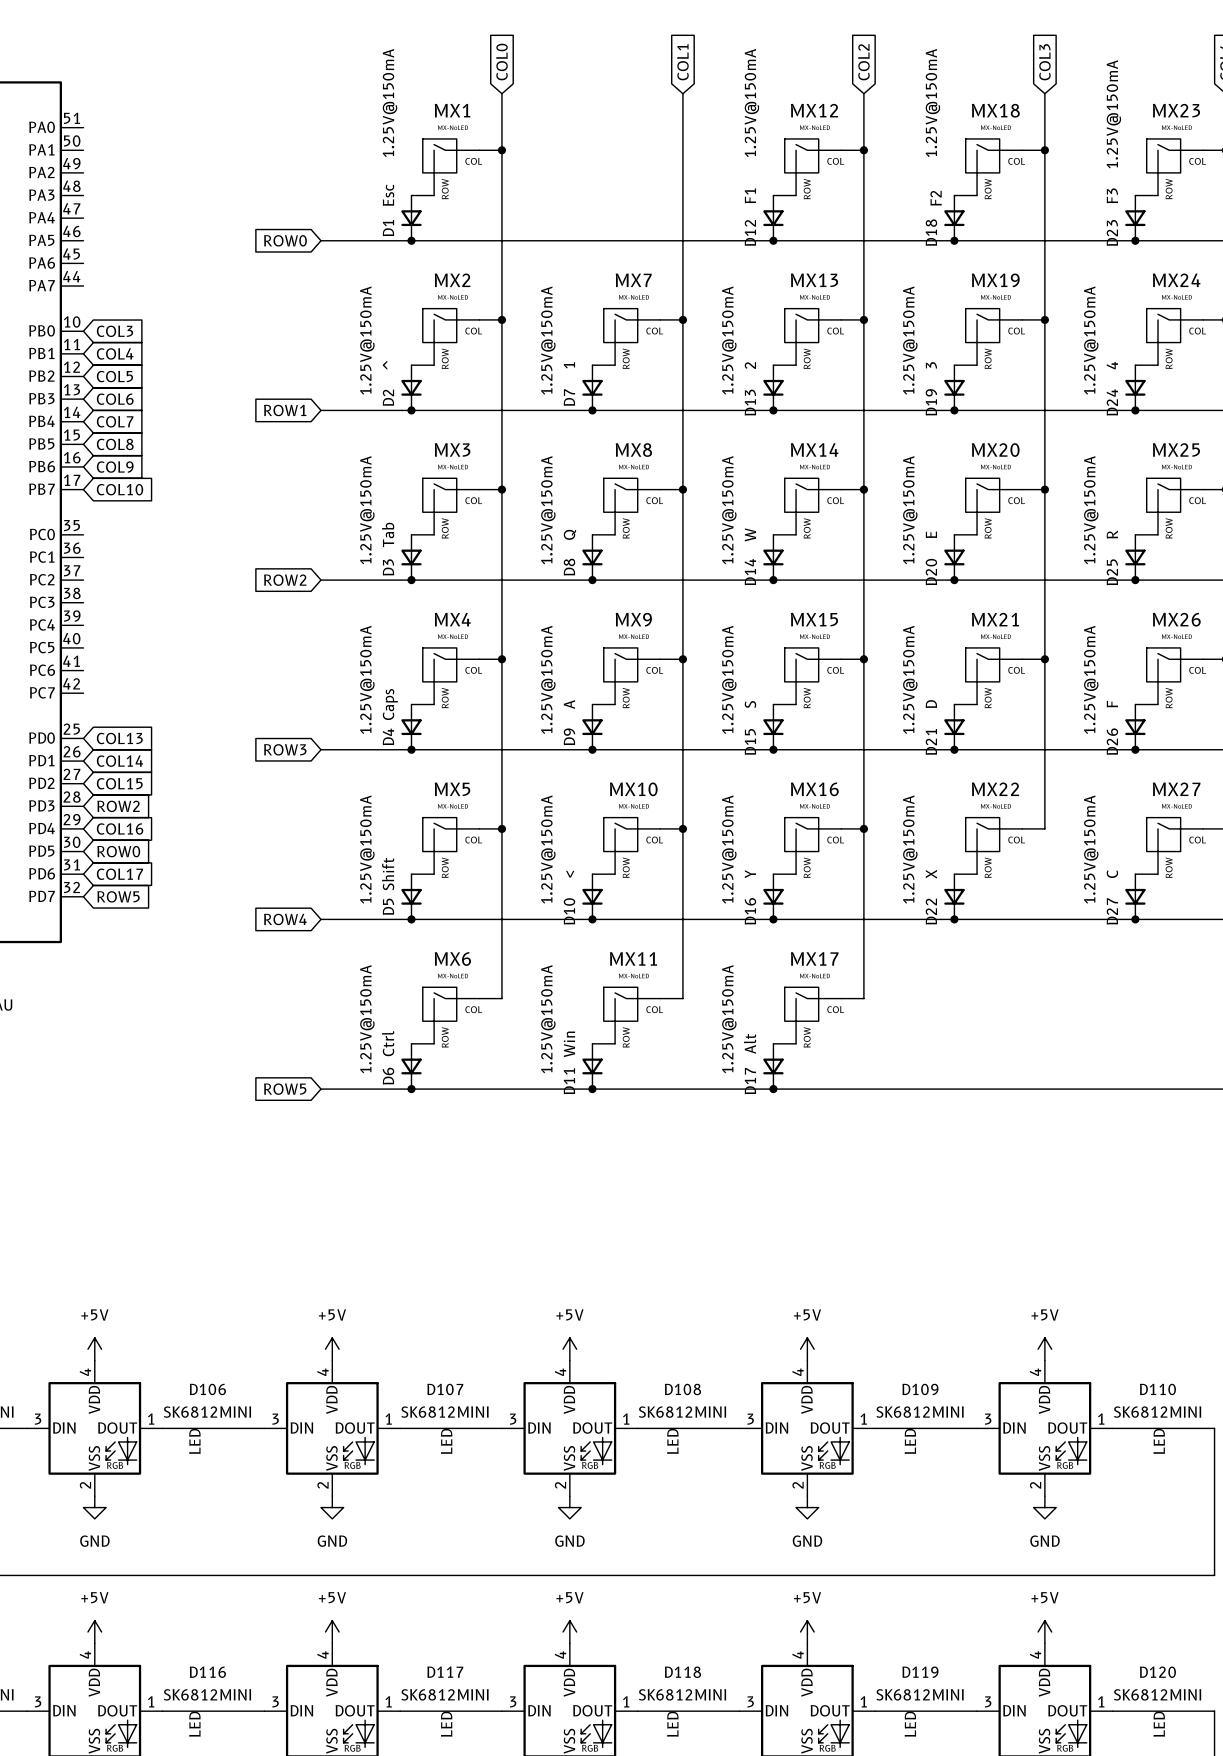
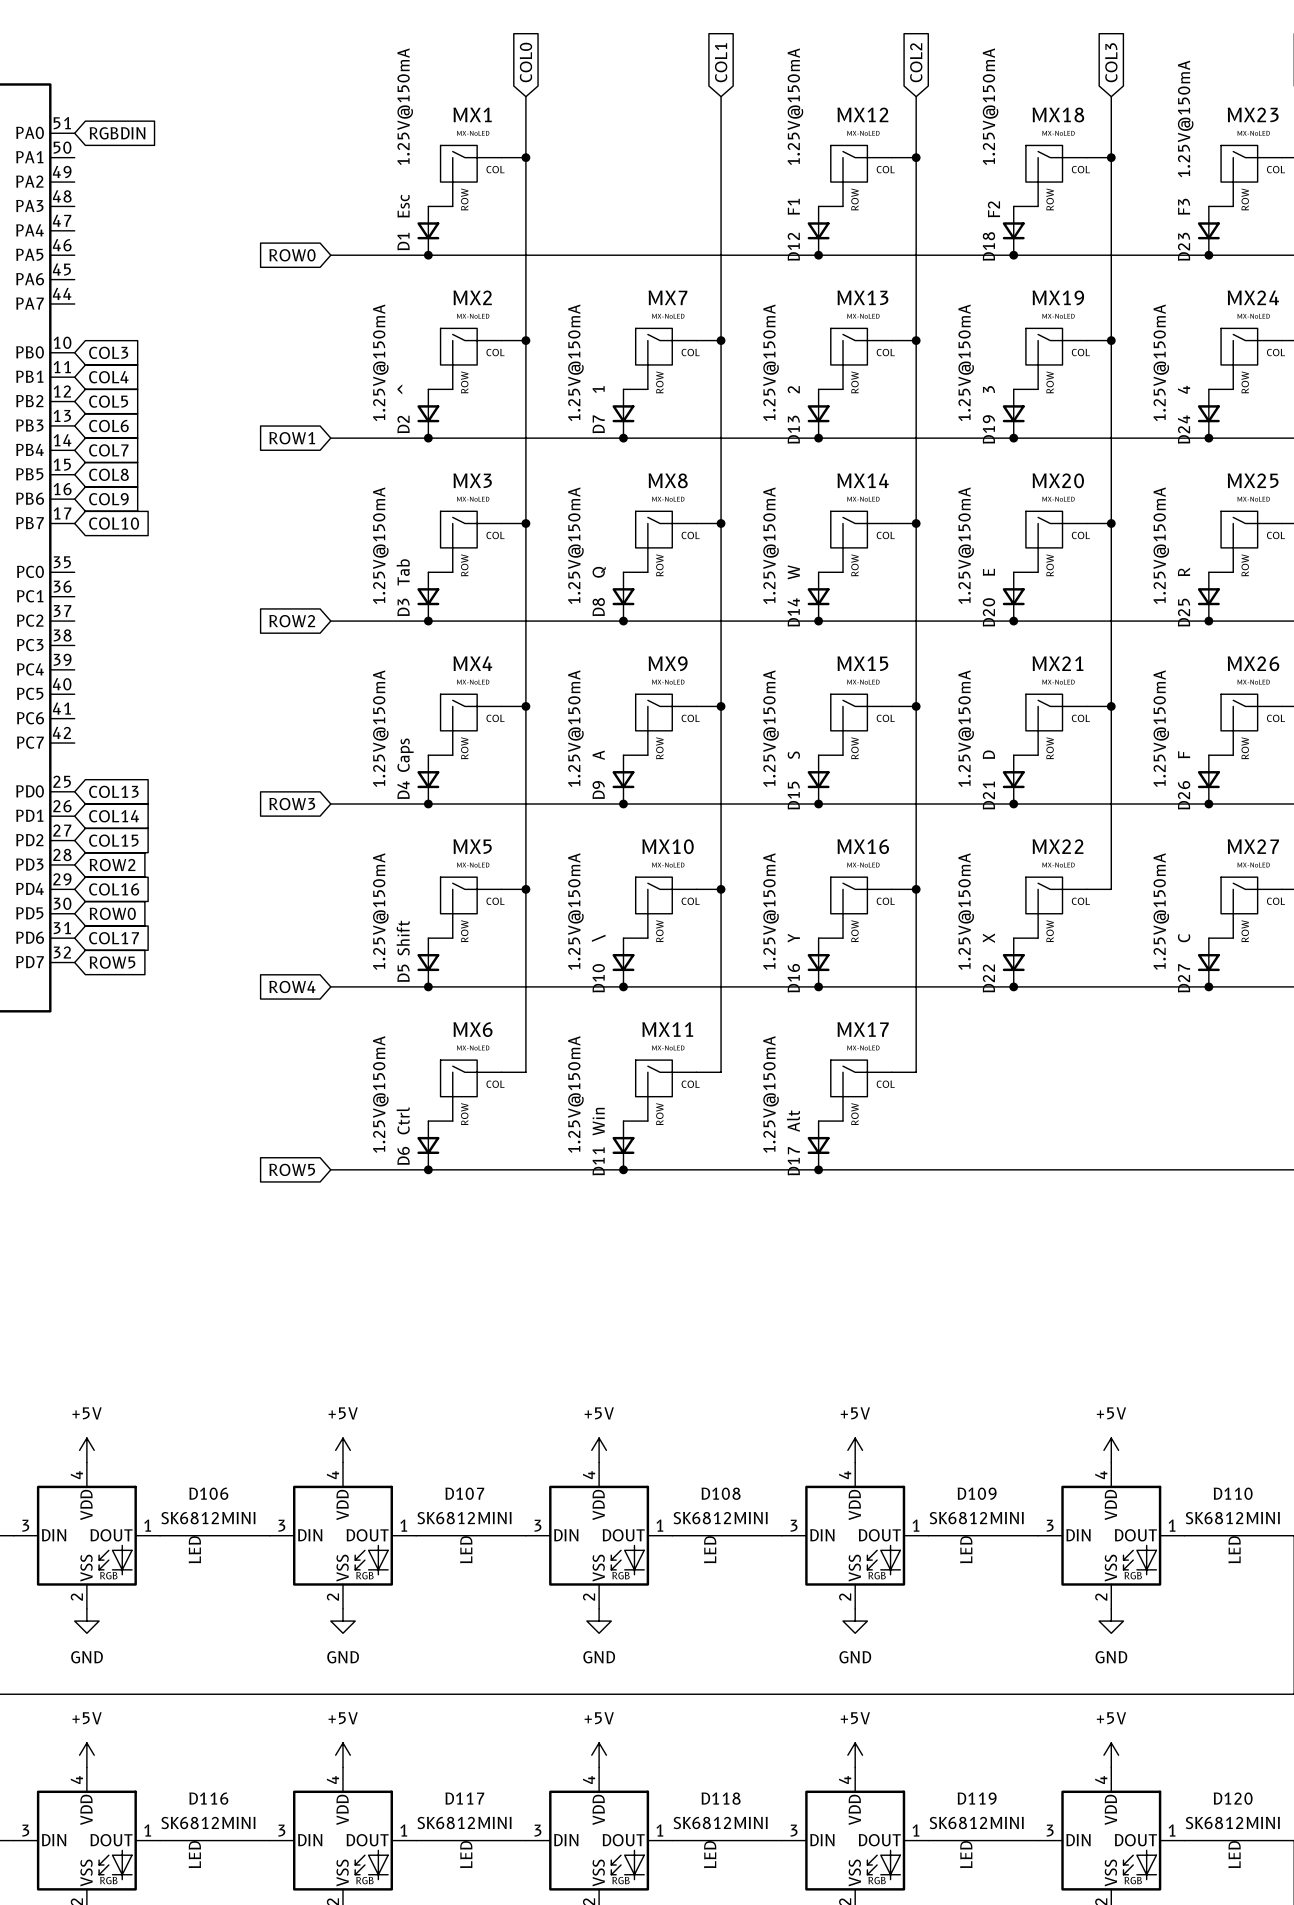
global label: none -> RGBDIN (117, 133)
D10 text: < (570, 874) -> \ (598, 938)

